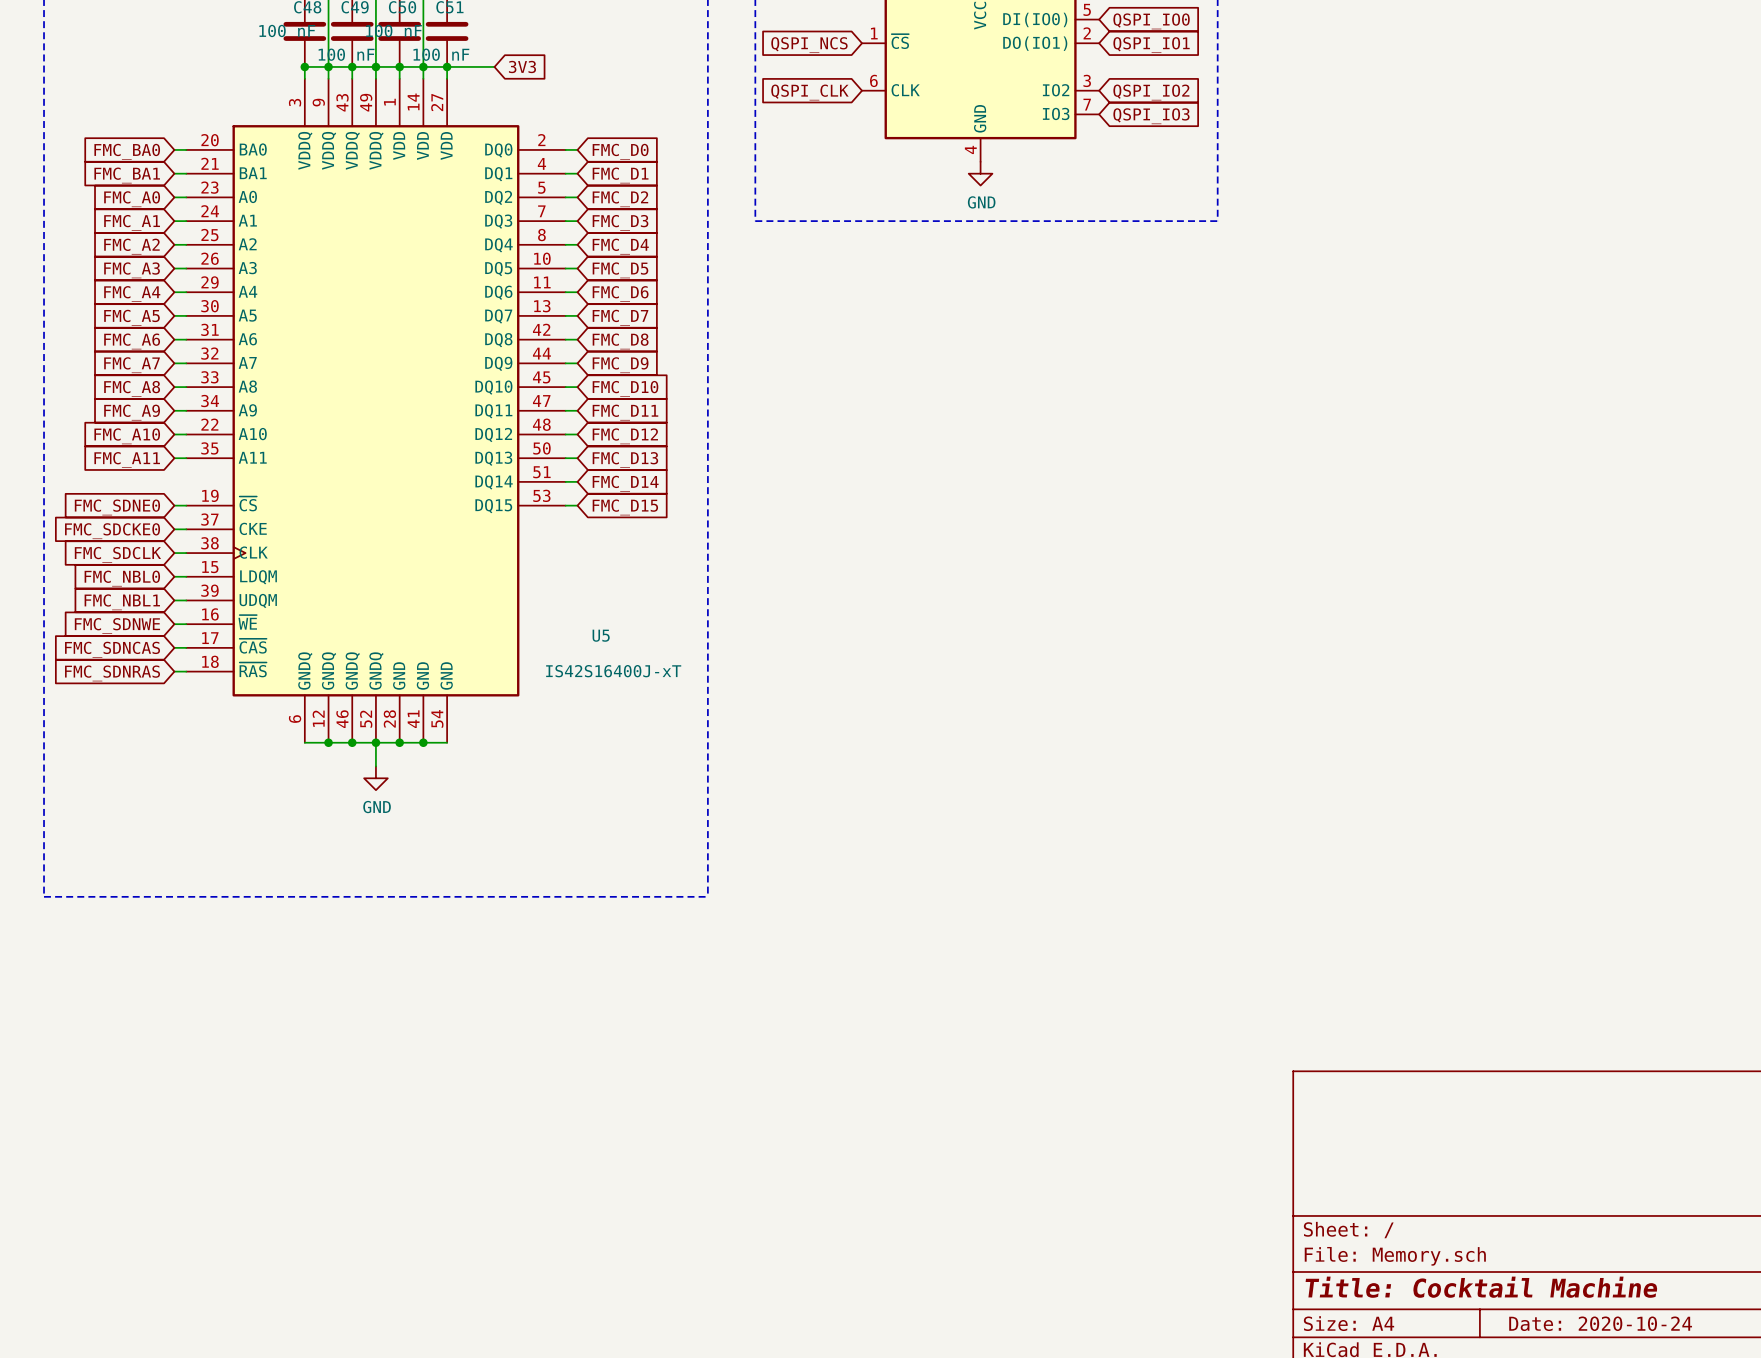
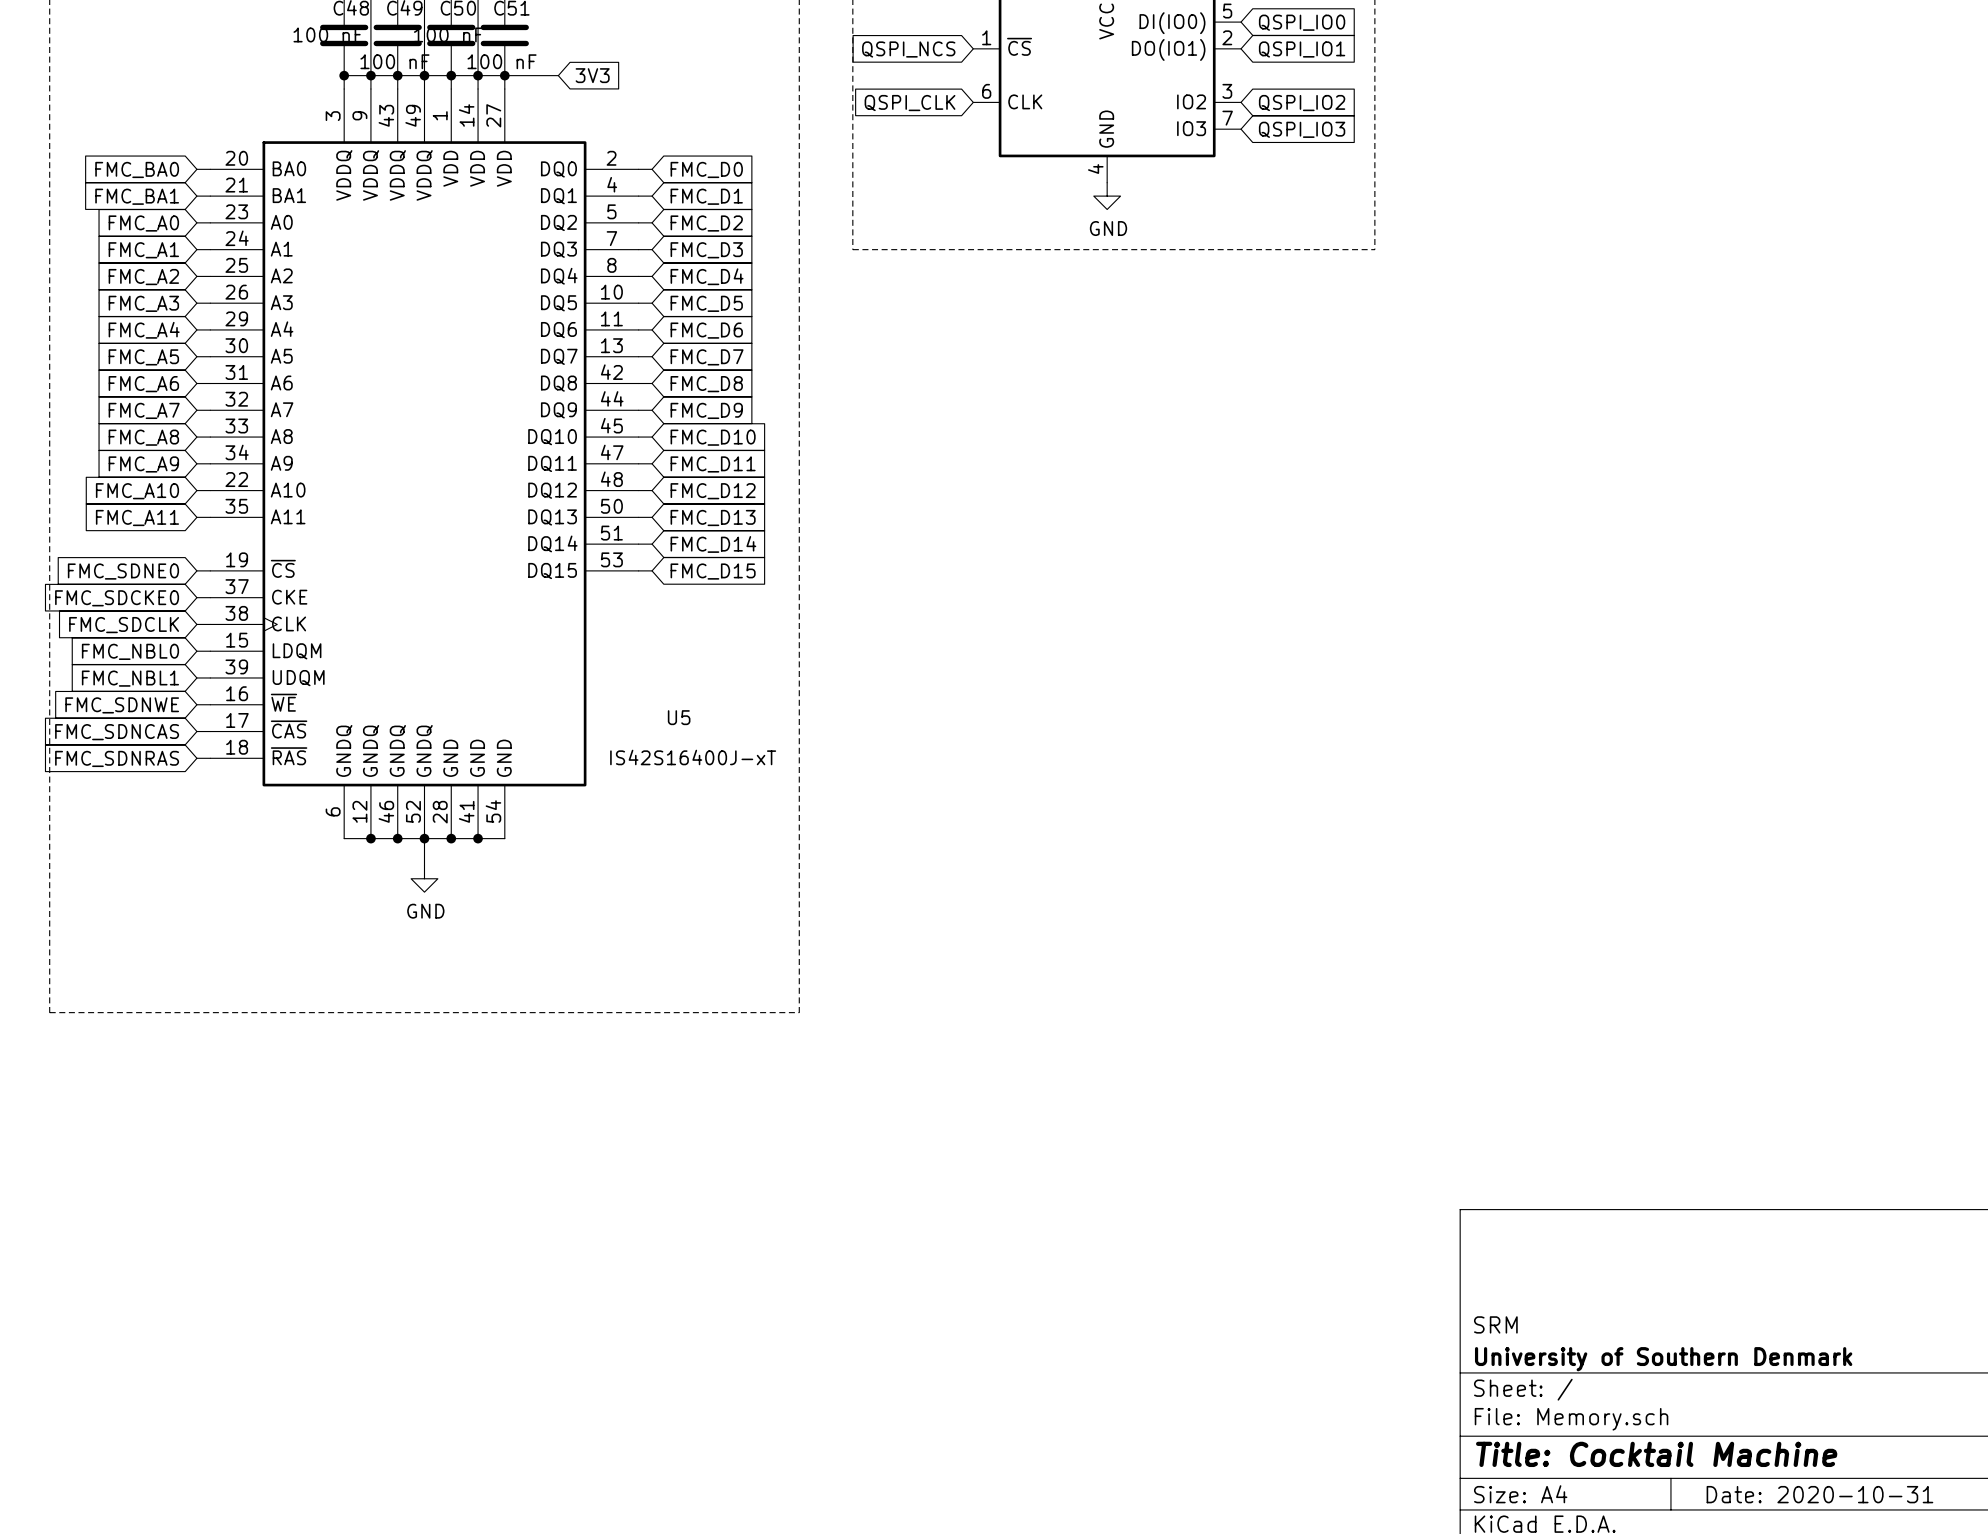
title block: none -> SRM (1495, 1324)
title block: none -> University of Southern Denmark (1663, 1359)
title block: Date: 2020-10-24 (1600, 1323) -> Date: 2020-10-31 (1819, 1494)

